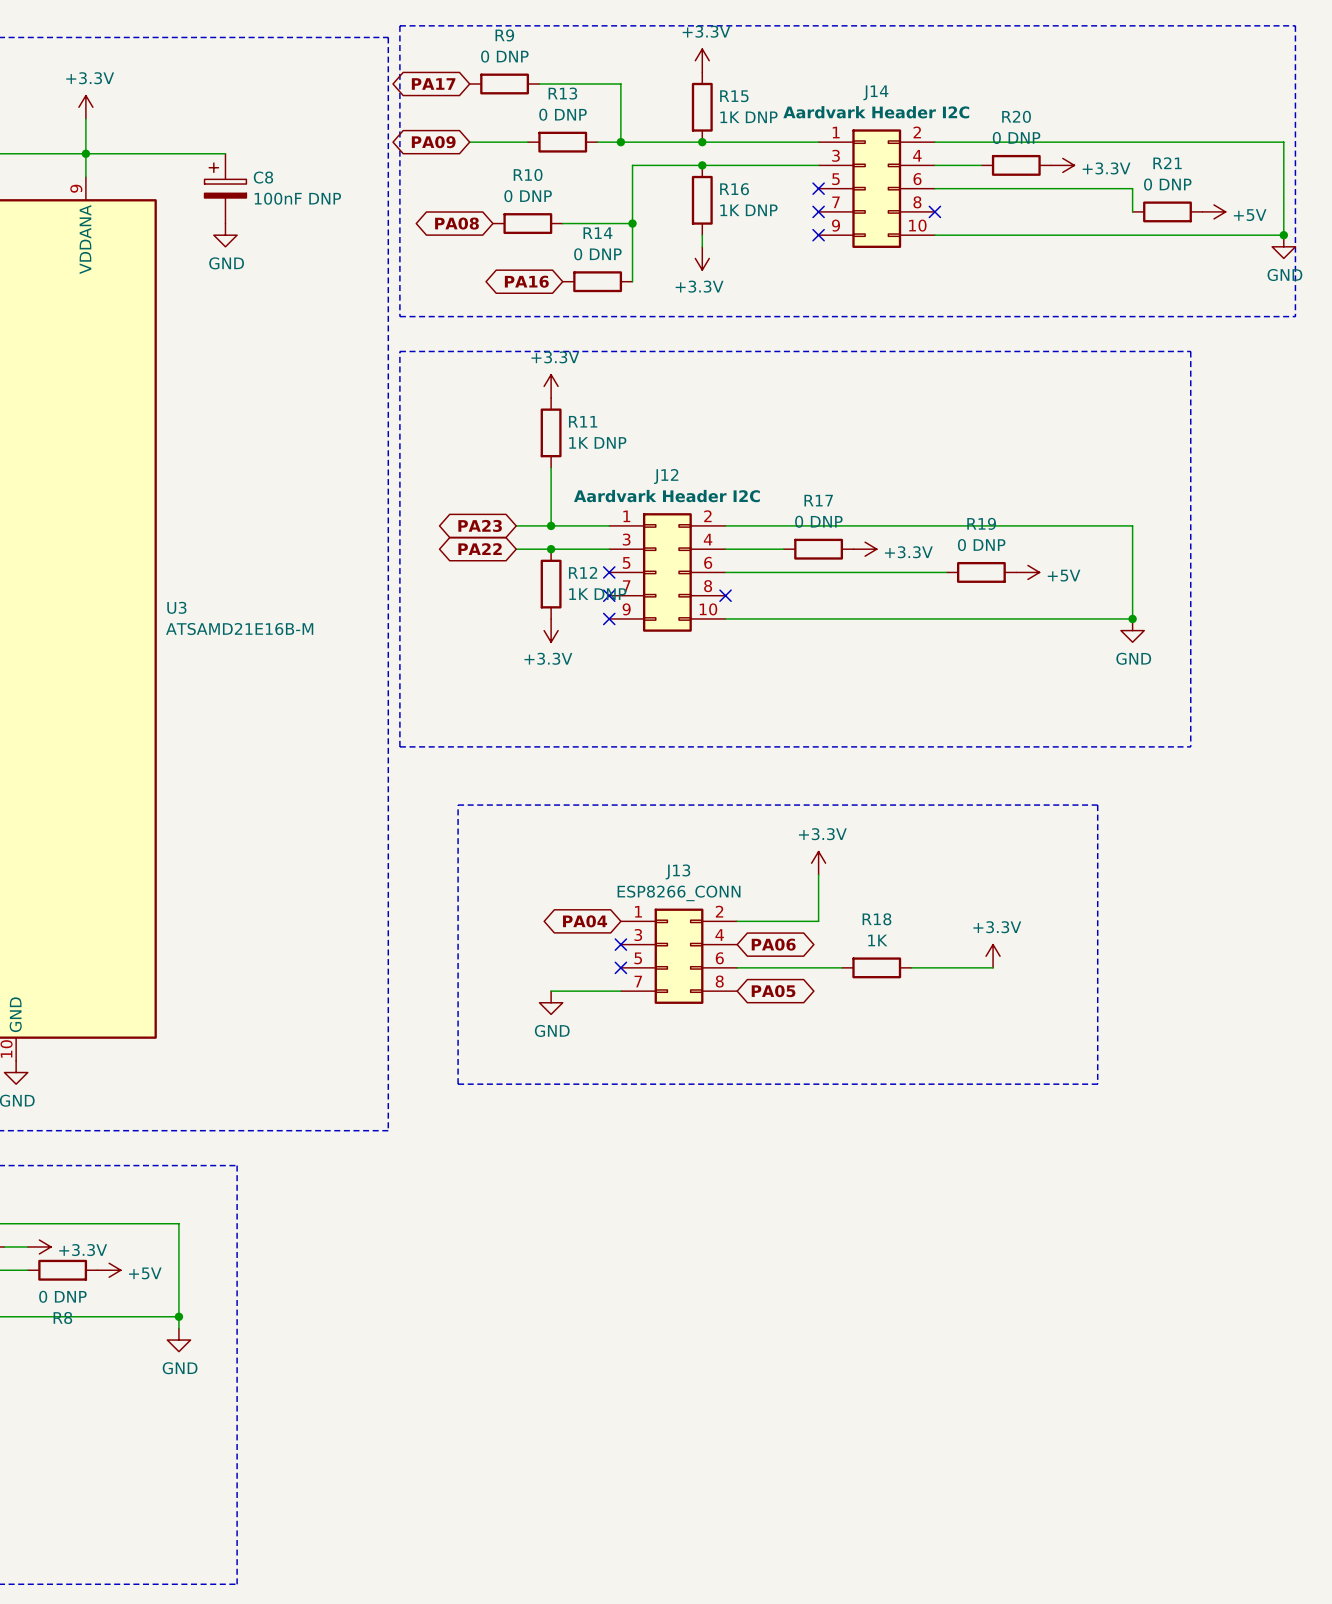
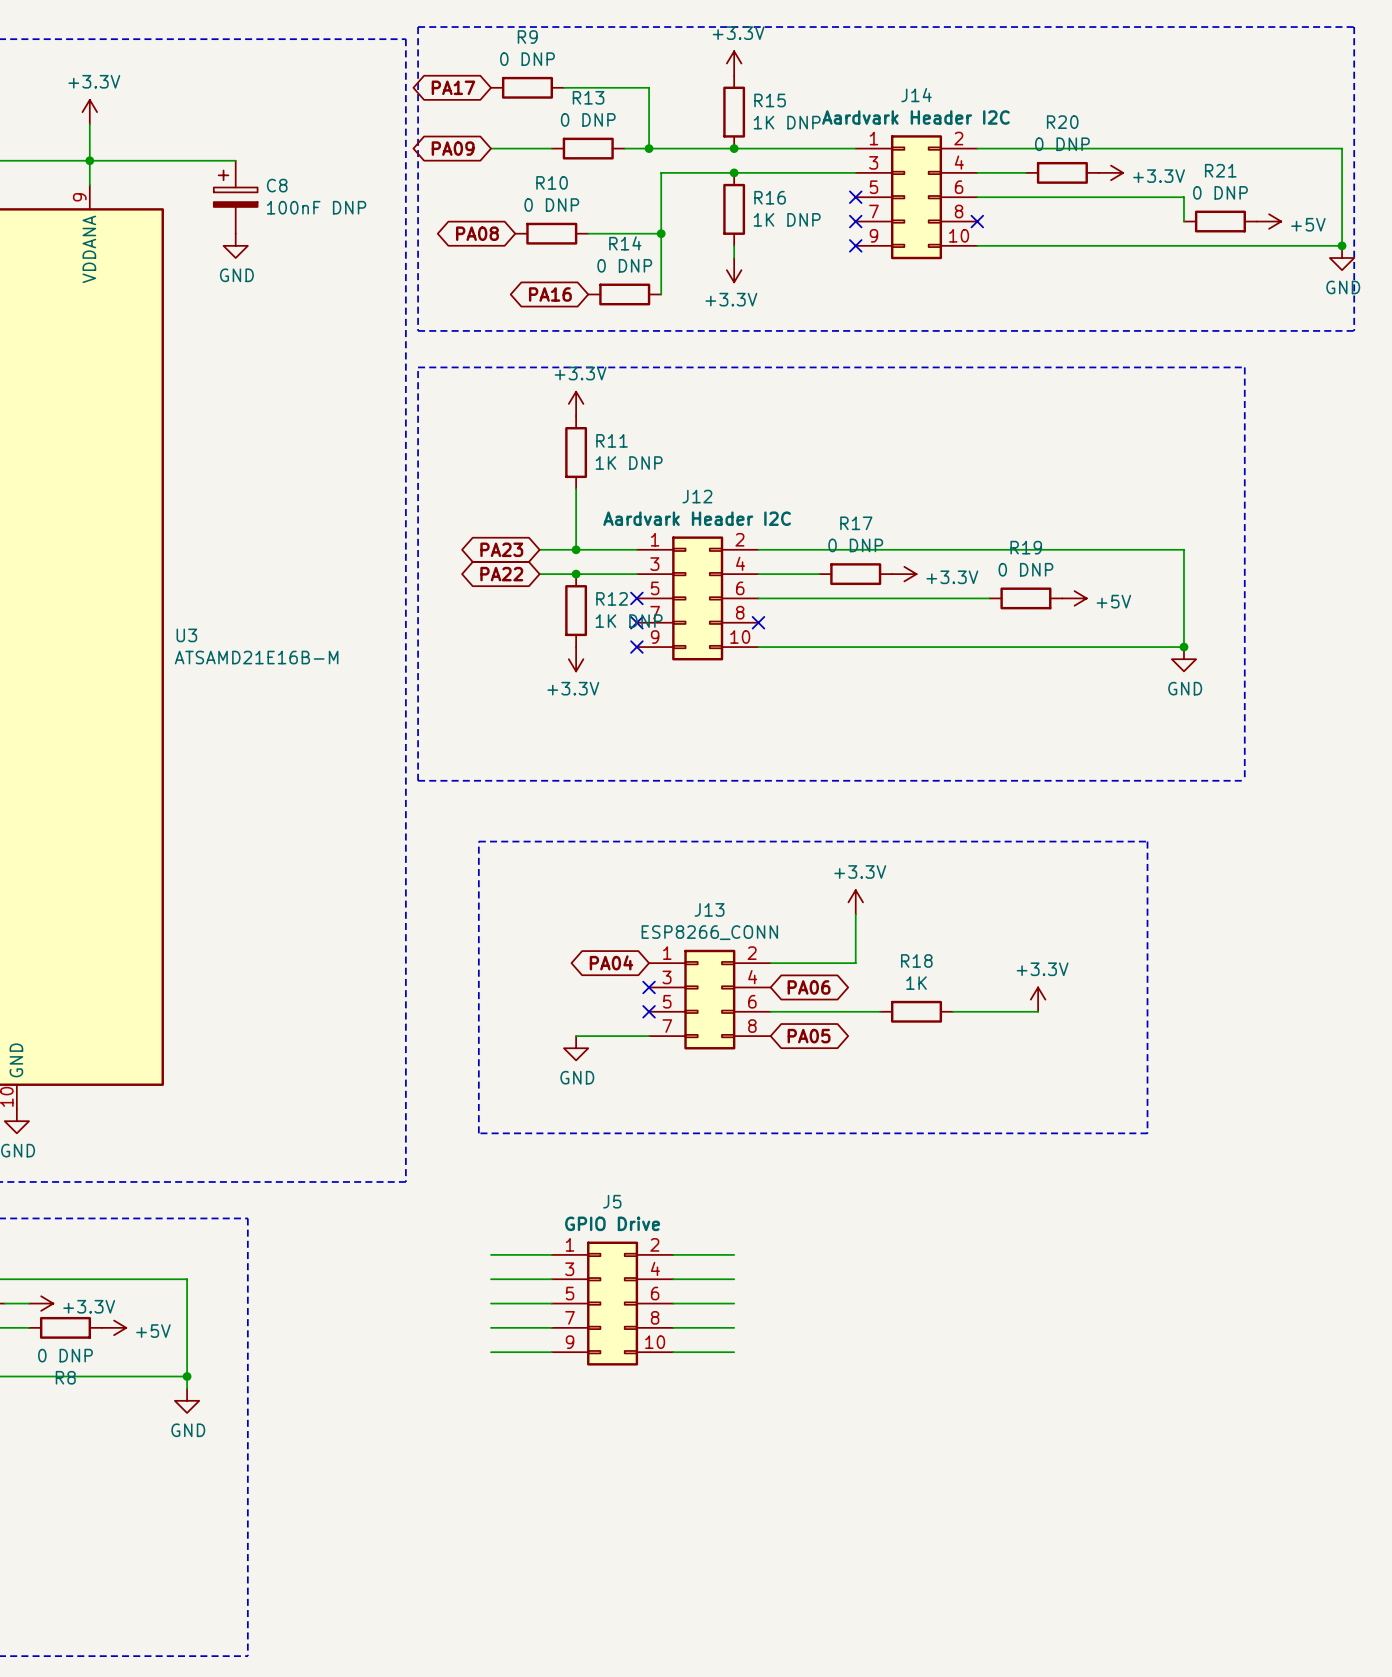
wire: none -> (491, 1254) (551, 1254)
wire: none -> (673, 1254) (734, 1254)
wire: none -> (491, 1279) (551, 1279)
wire: none -> (673, 1279) (734, 1279)
wire: none -> (491, 1303) (551, 1303)
J5: none -> GPIO Drive (612, 1303)
wire: none -> (673, 1303) (734, 1303)
wire: none -> (491, 1327) (551, 1327)
wire: none -> (673, 1327) (734, 1327)
wire: none -> (491, 1352) (551, 1352)
wire: none -> (673, 1352) (734, 1352)

